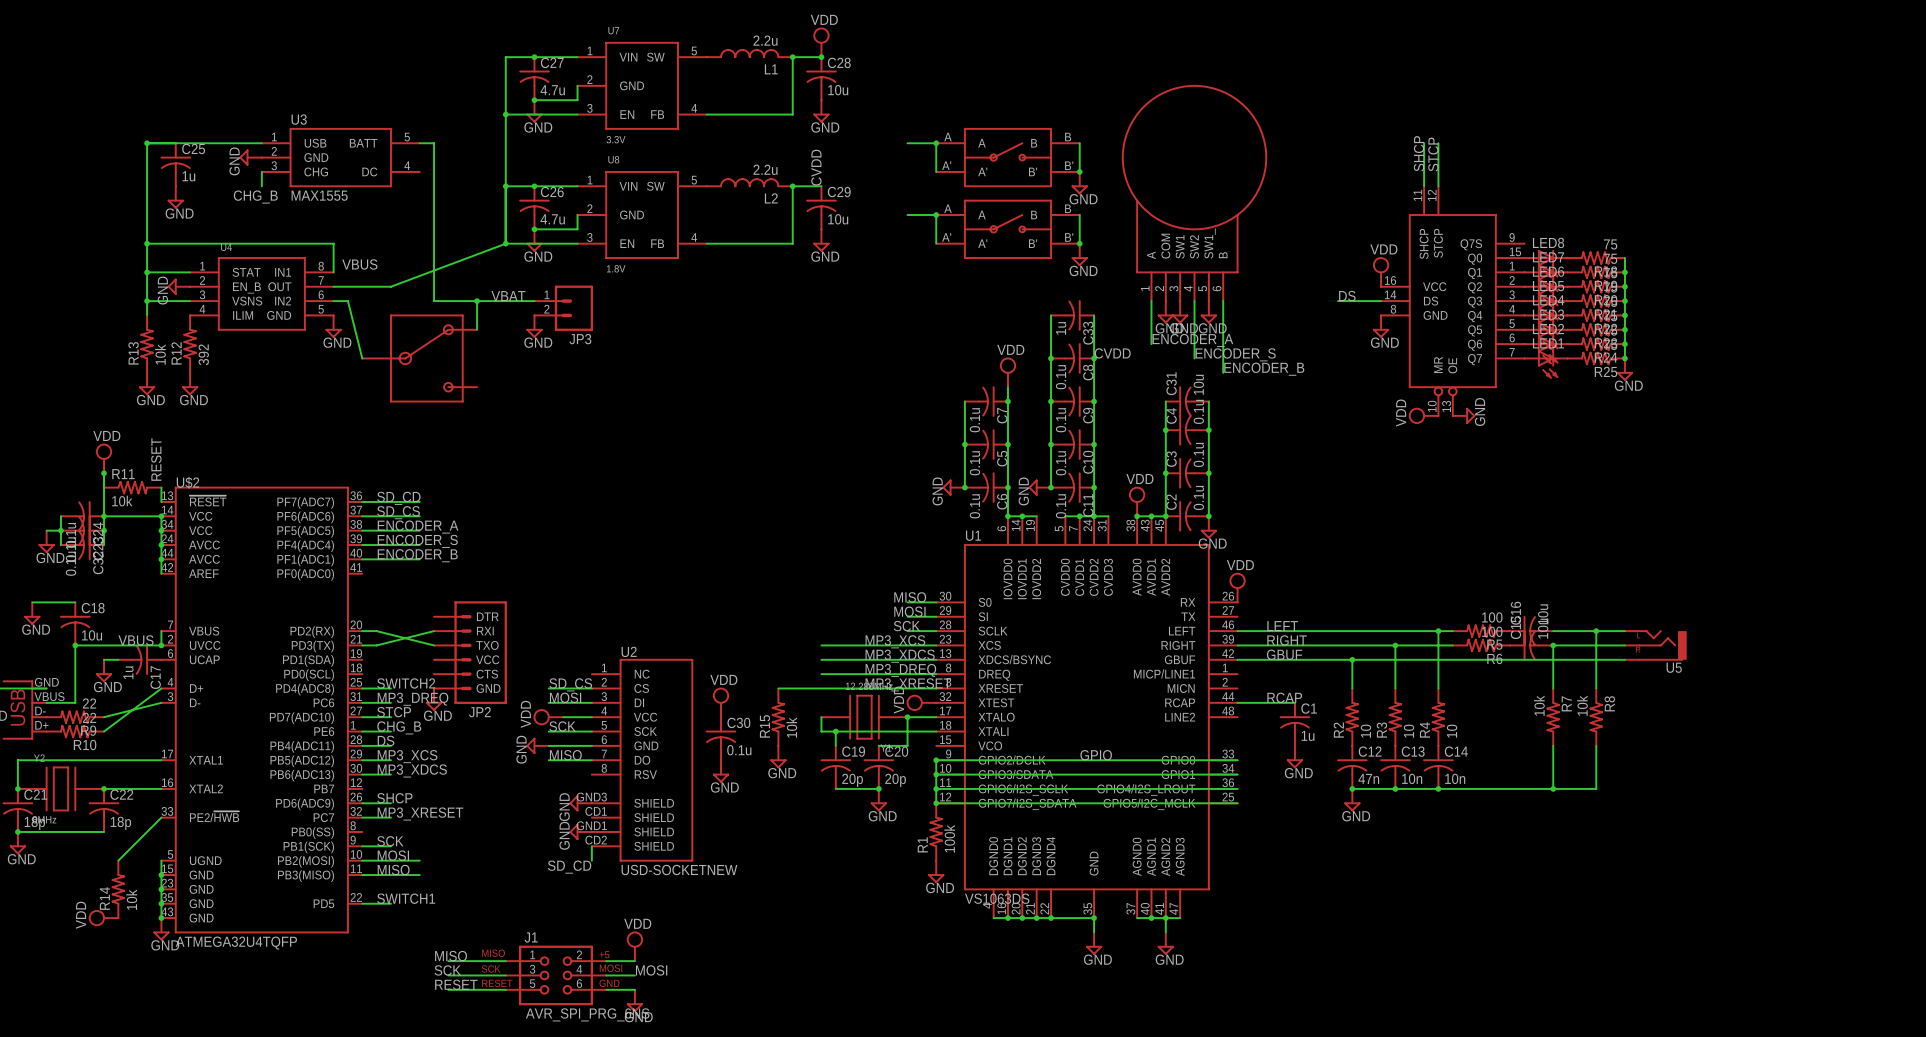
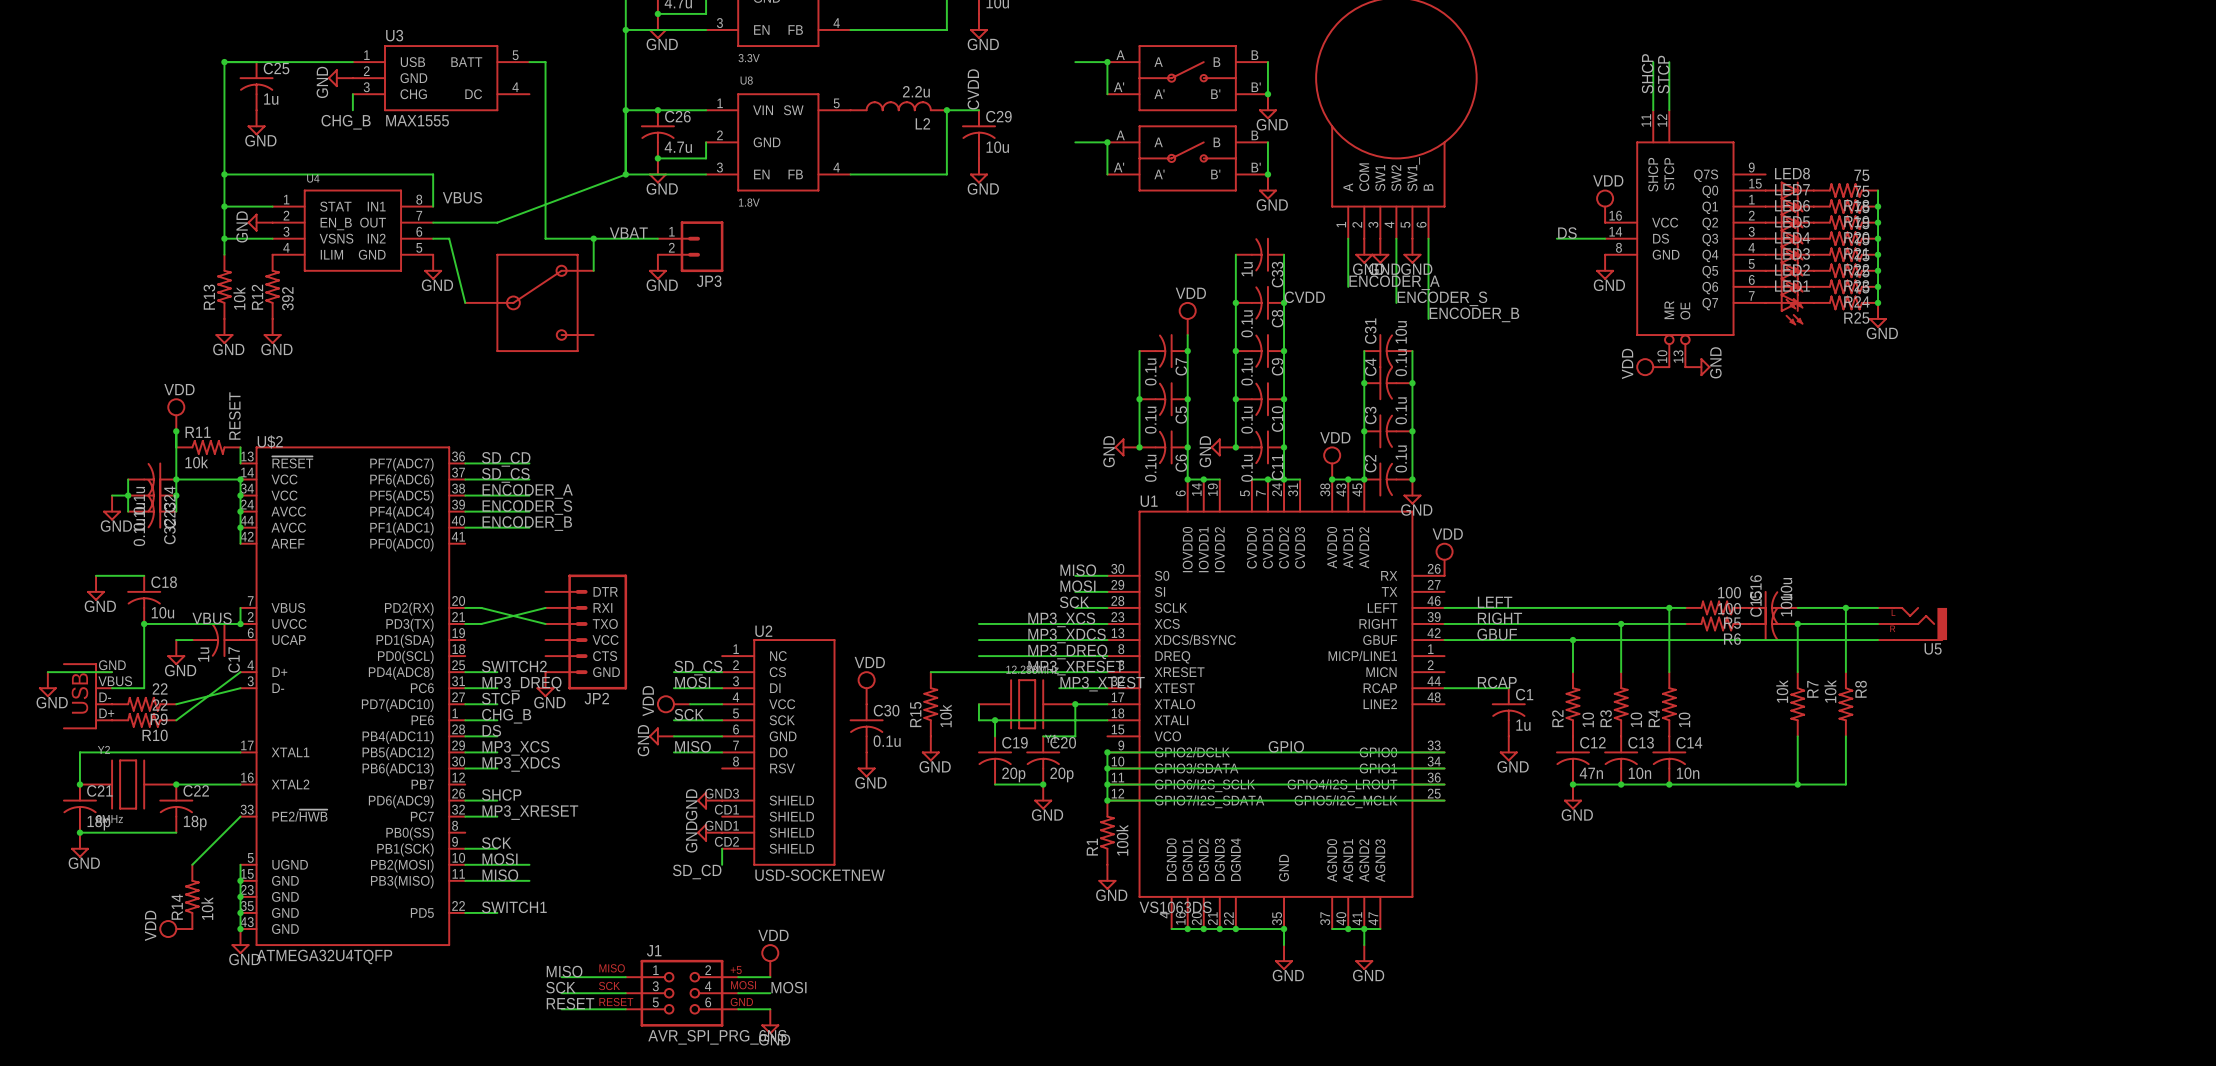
label: none -> MP3_XTEST (1102, 684)
power symbol: VDD (921, 702) -> none

